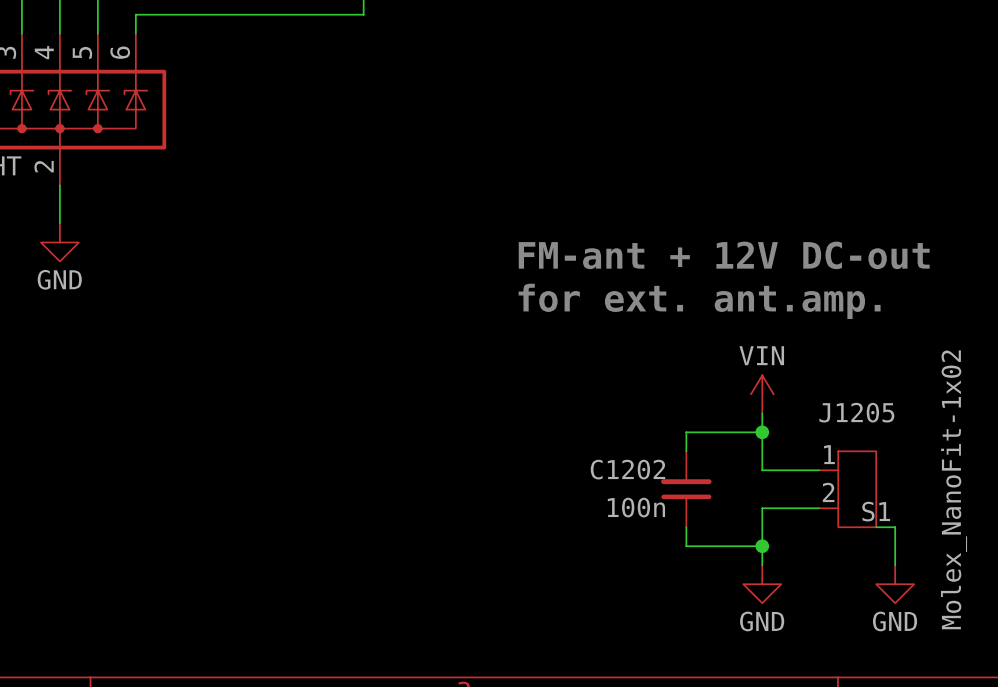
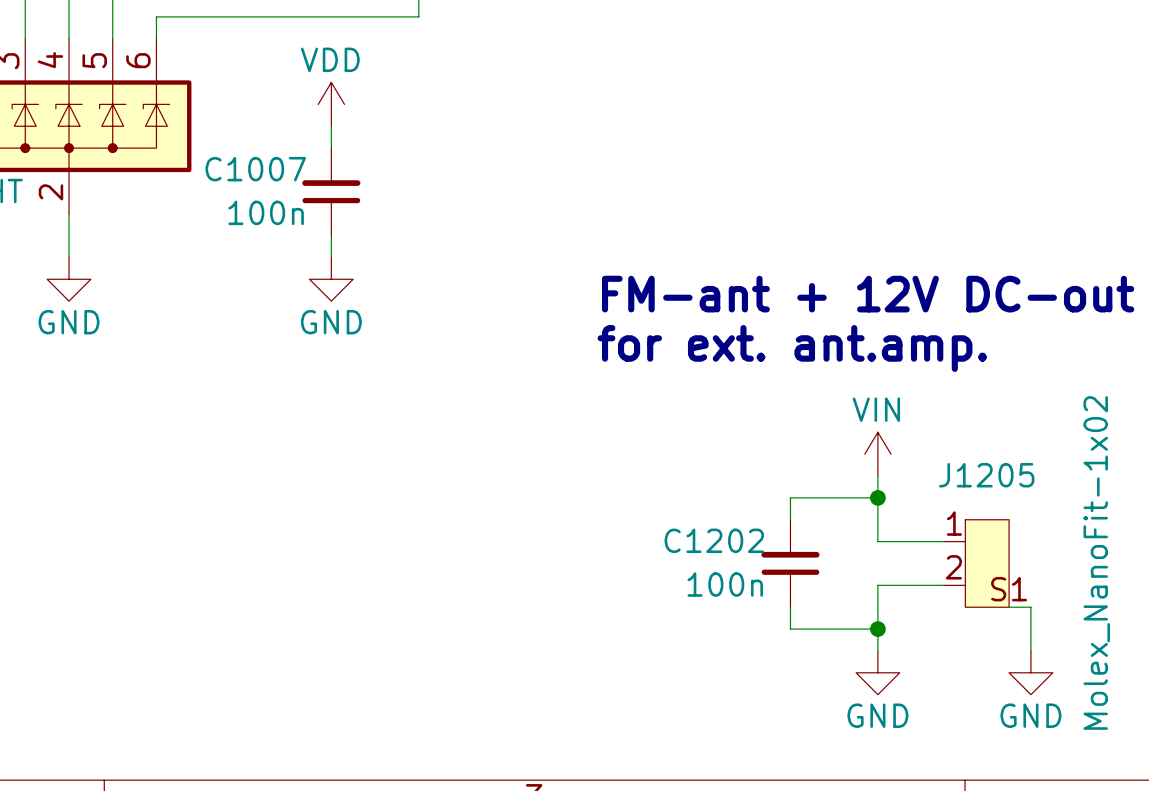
power symbol: none -> VDD (331, 104)
wire: none -> (331, 126) (331, 148)
C1007: none -> 100n (331, 191)
wire: none -> (331, 235) (331, 257)
power symbol: none -> GND (331, 279)

